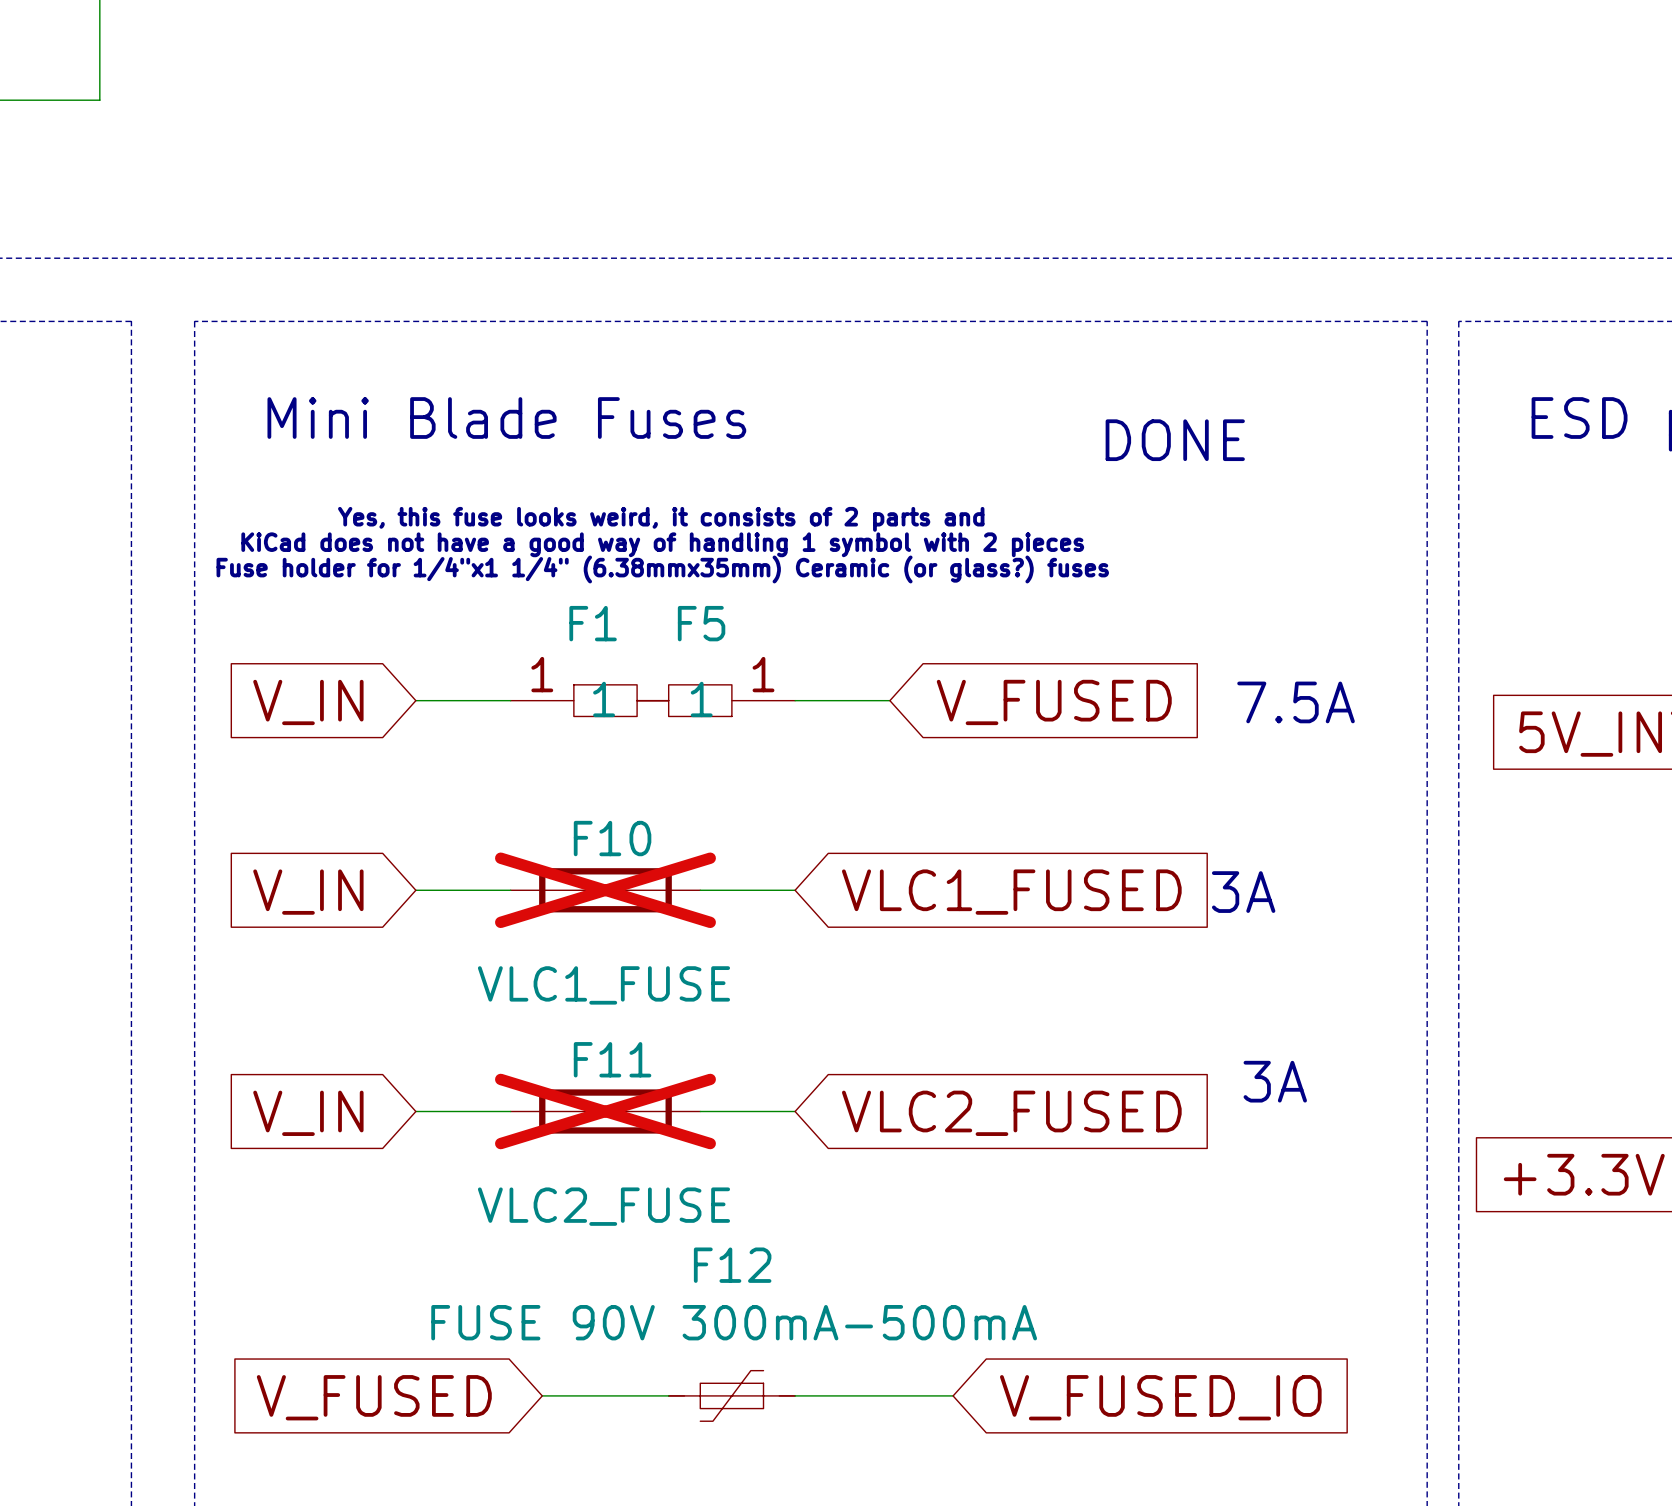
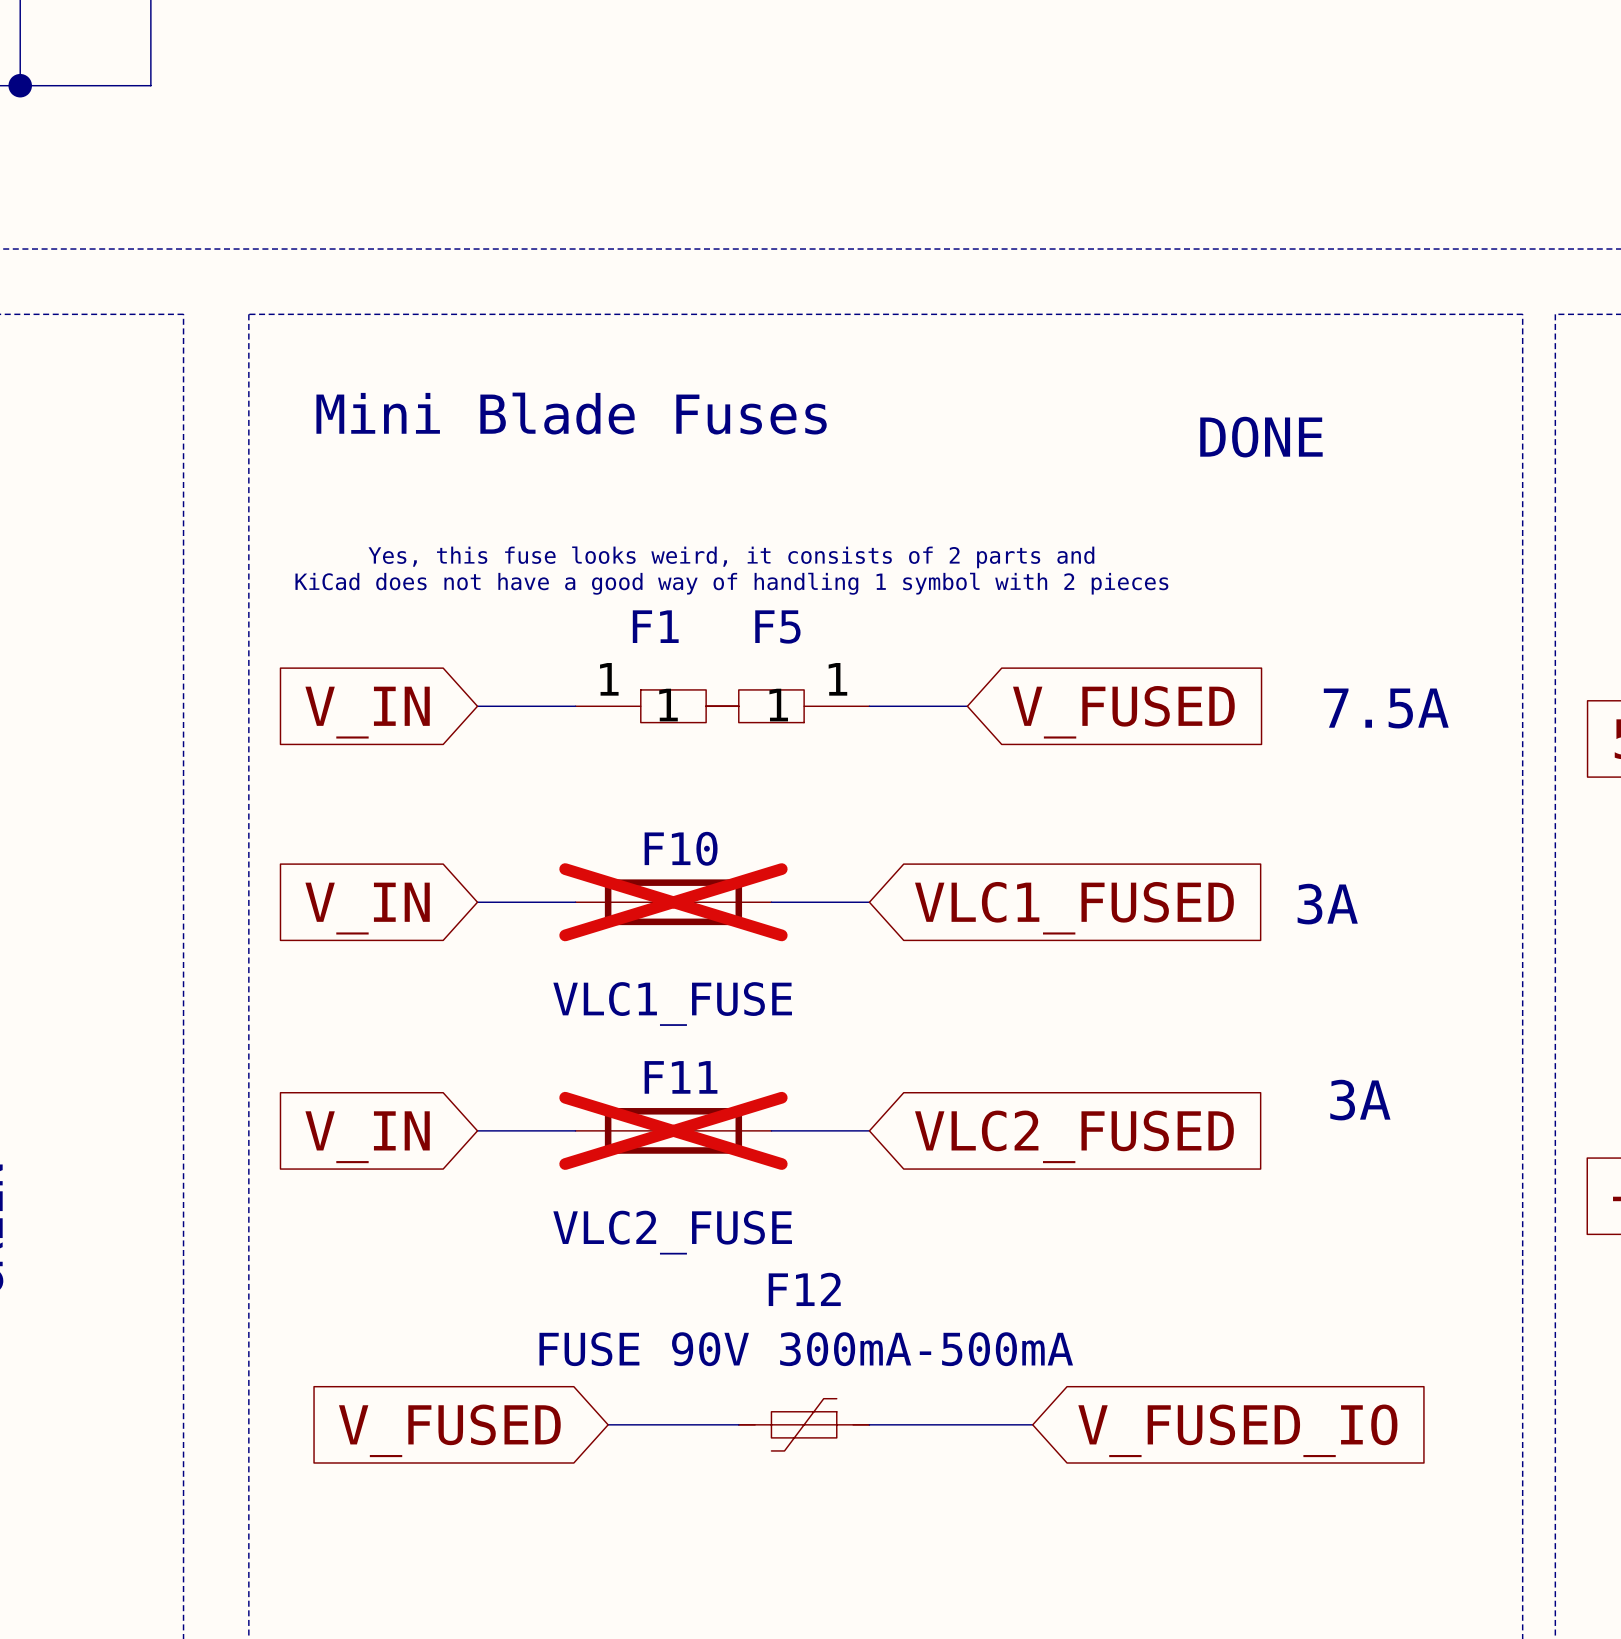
text position: Yes, this fuse looks weird, it consists of 2 parts and (661, 519) -> Yes, this fuse looks weird, it consists of 2 parts and (731, 557)
text position: KiCad does not have a good way of handling 1 symbol with 2 pieces (662, 544) -> KiCad does not have a good way of handling 1 symbol with 2 pieces (731, 583)
text: Fuse holder for 1/4"x1 1/4" (6.38mmx35mm) Ceramic (or glass?) fuses (662, 569) -> none

